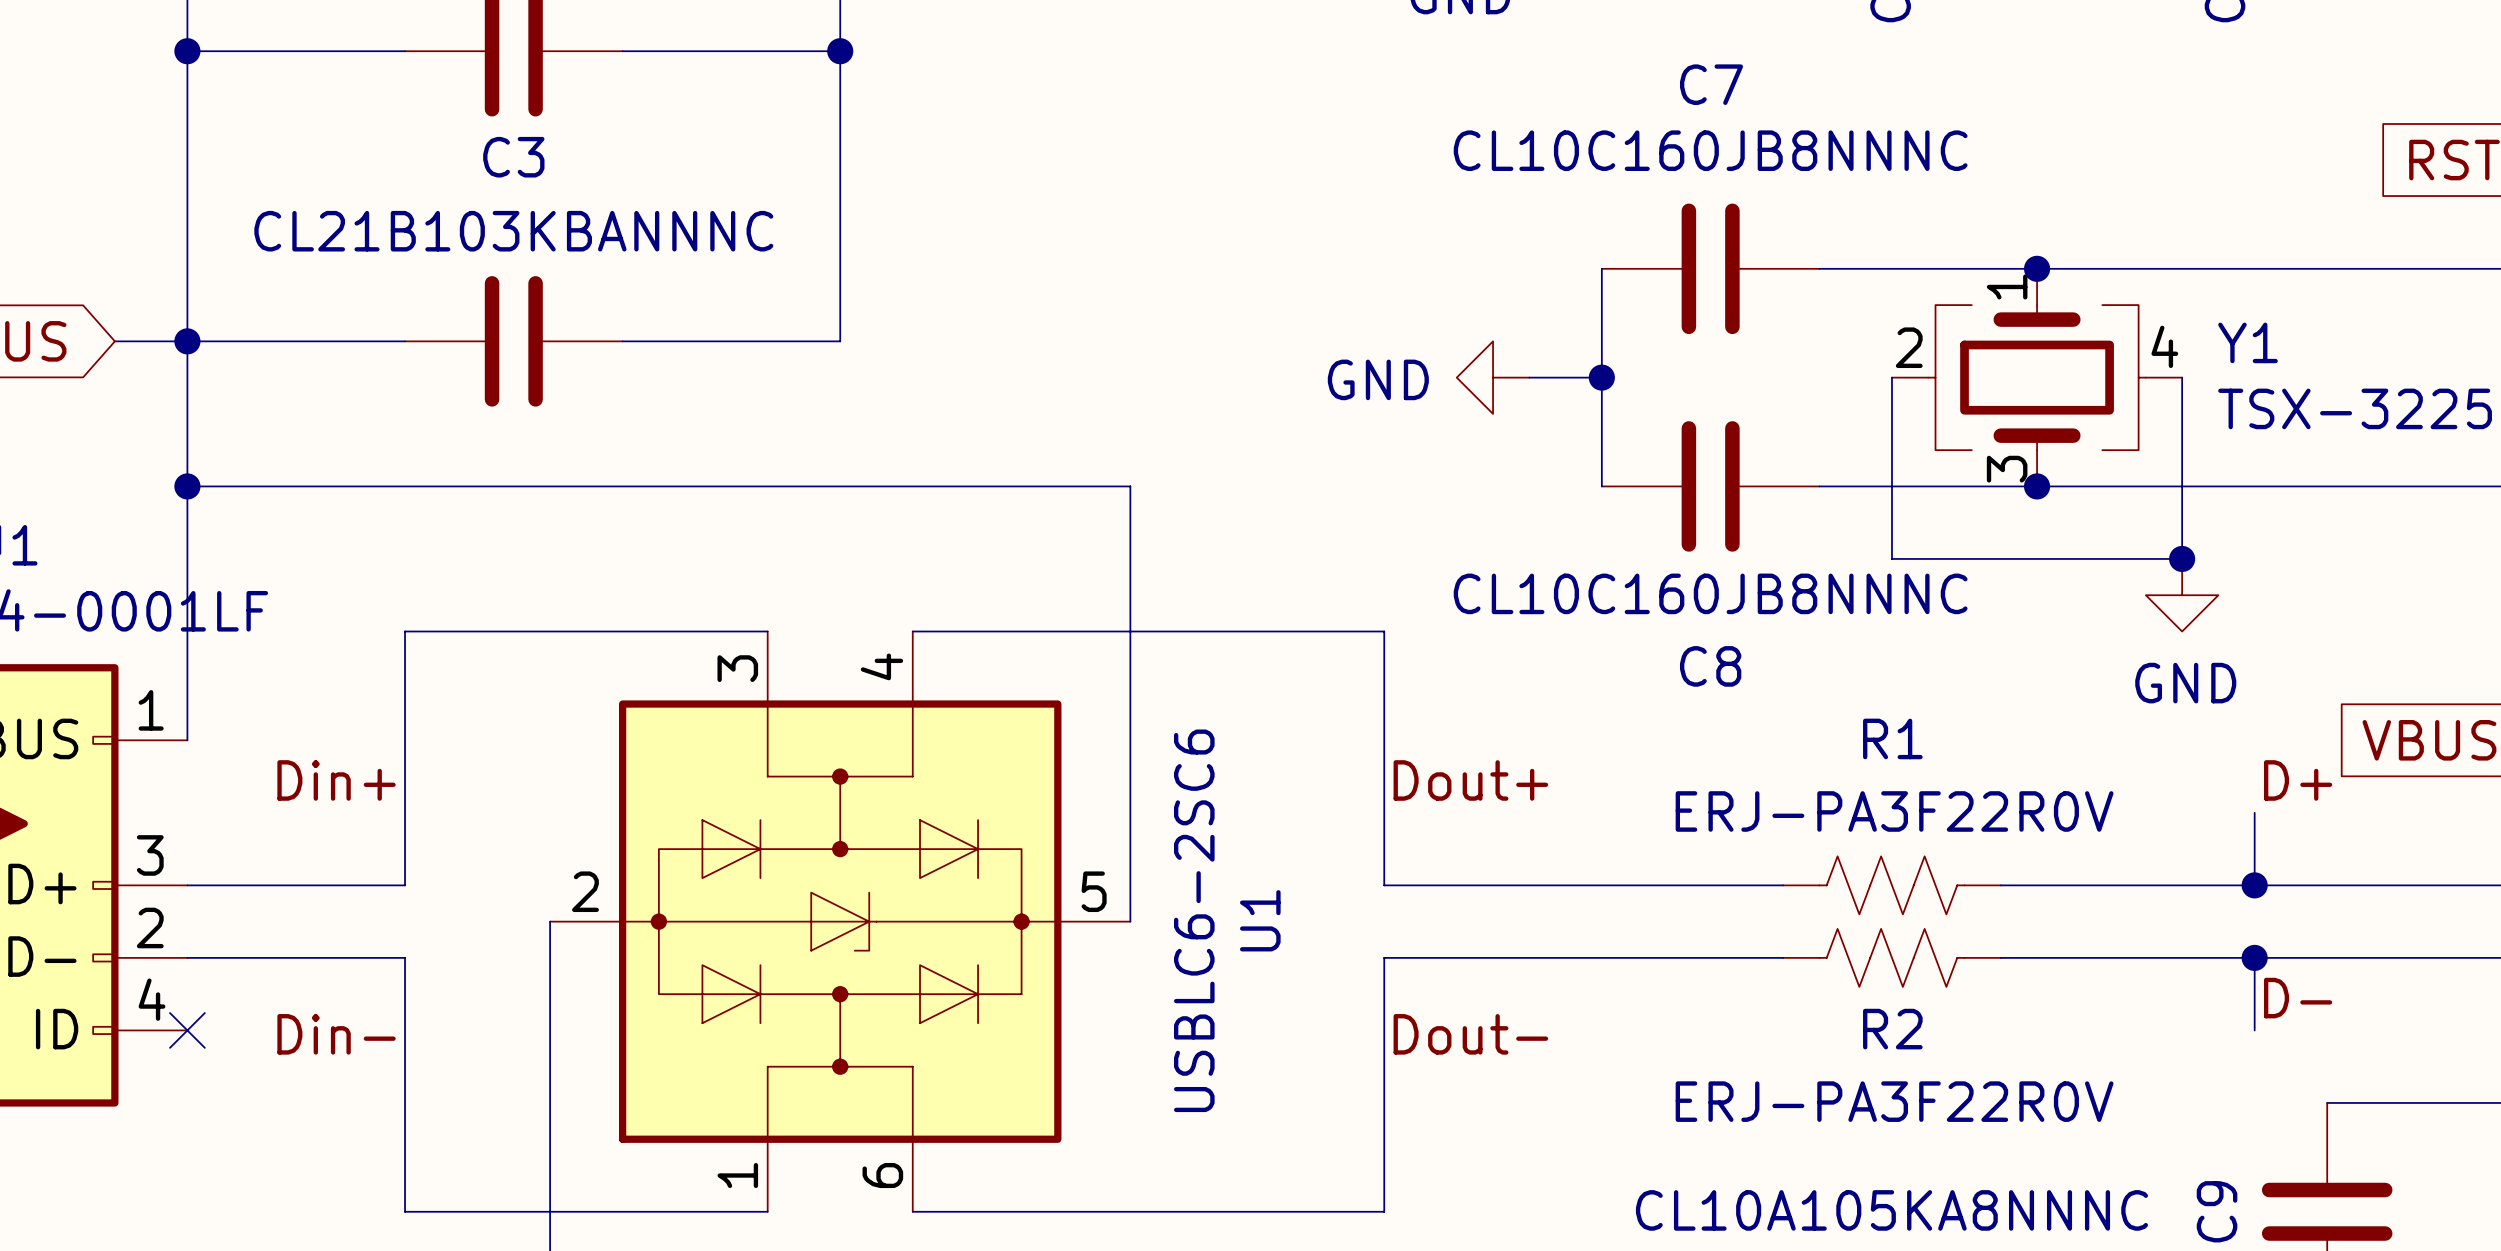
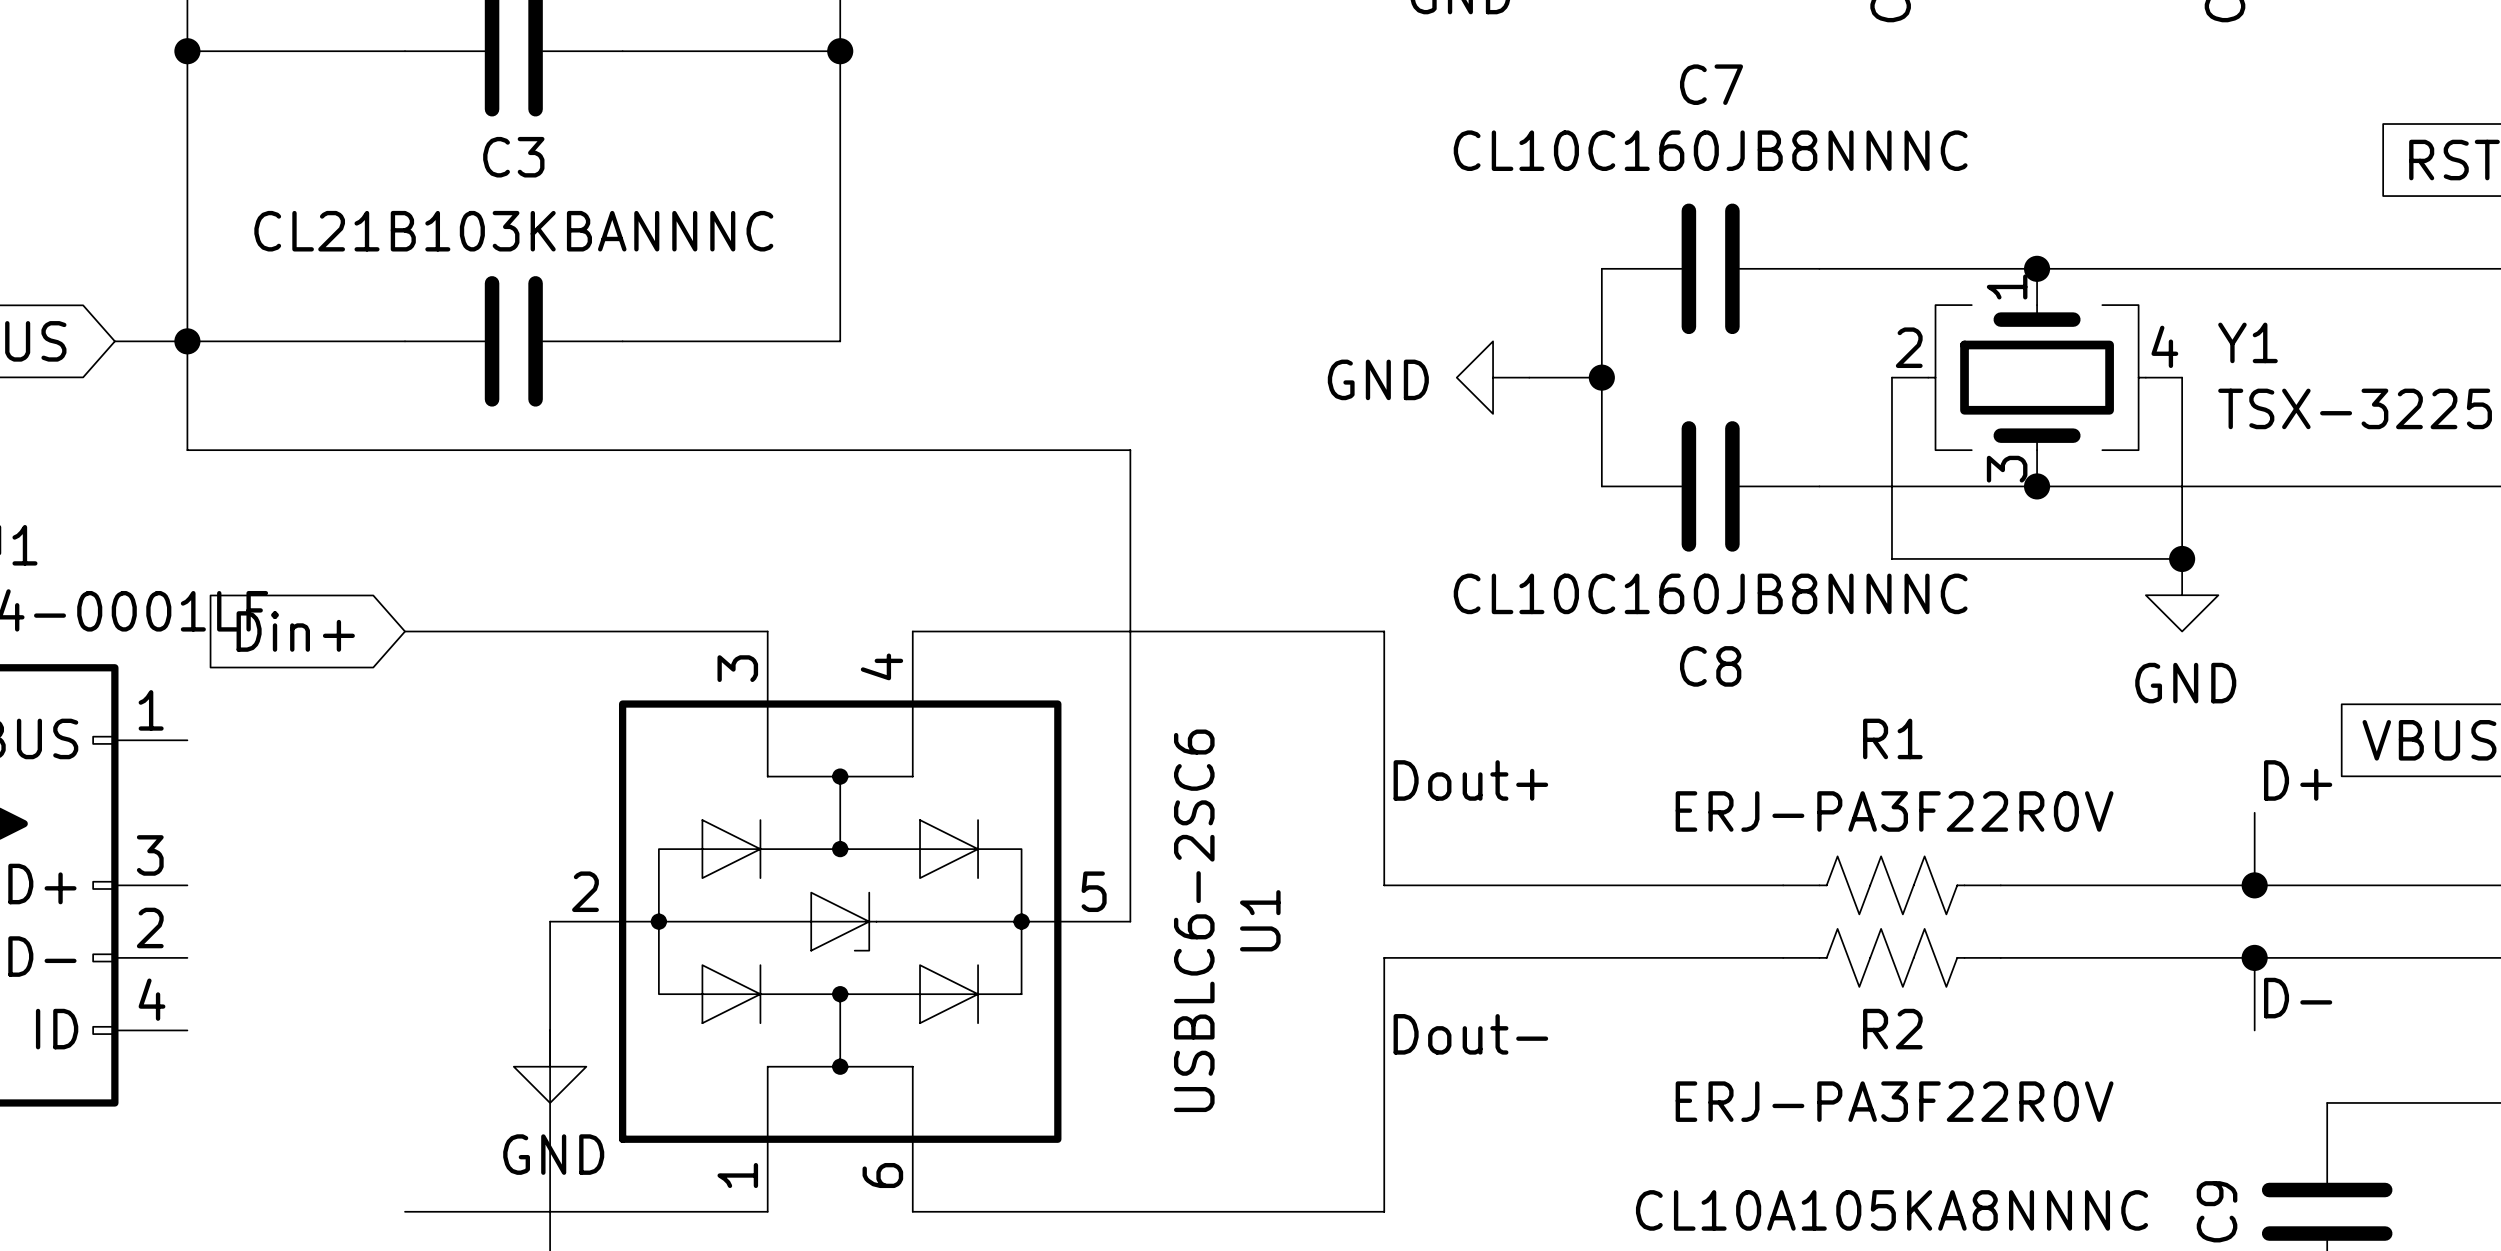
wire: (187, 450) (187, 740) -> none
wire: (187, 486) (1130, 486) -> (187, 450) (1130, 450) (1130, 486)
junction: (187, 486) -> none
global label: none -> Din+ (295, 631)
wire: (405, 631) (405, 885) (187, 885) -> none
label: Din+ (336, 780) -> none
wire: (187, 957) (405, 957) (405, 1211) -> none
no-connect mark: (187, 1030) -> none
label: Din- (336, 1034) -> none
power symbol: none -> GND (550, 1066)

